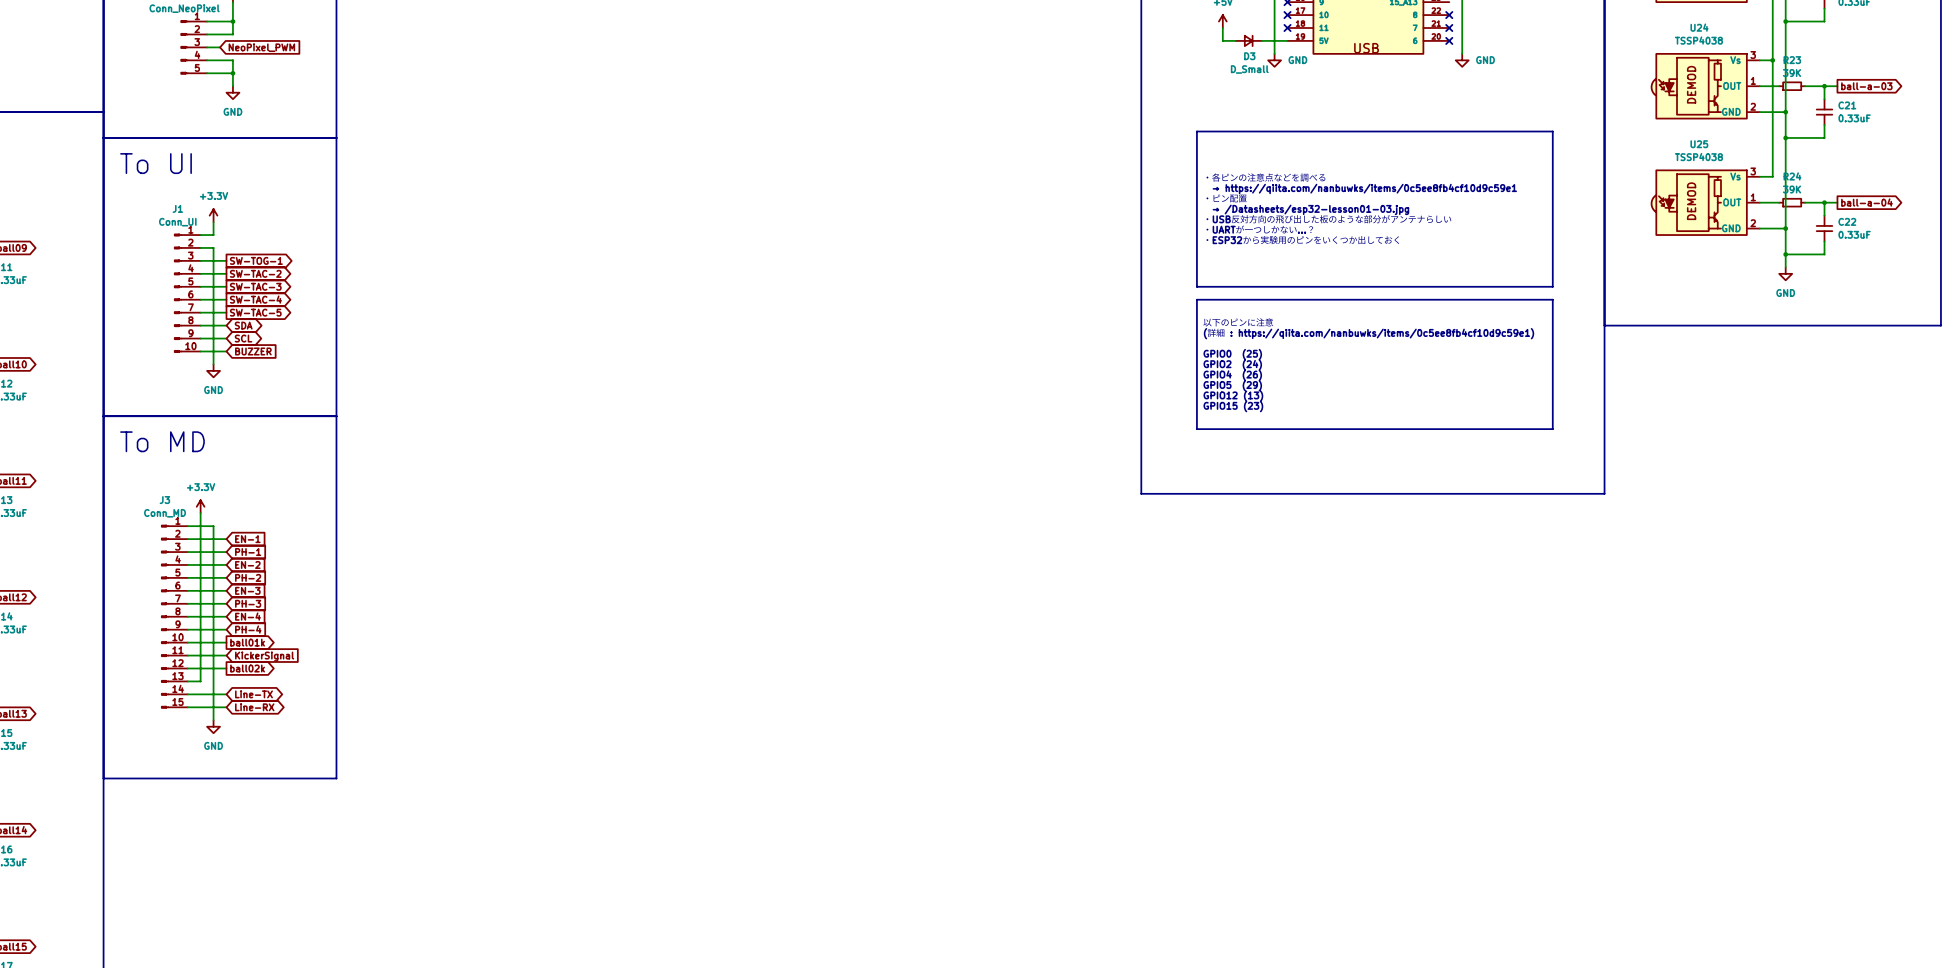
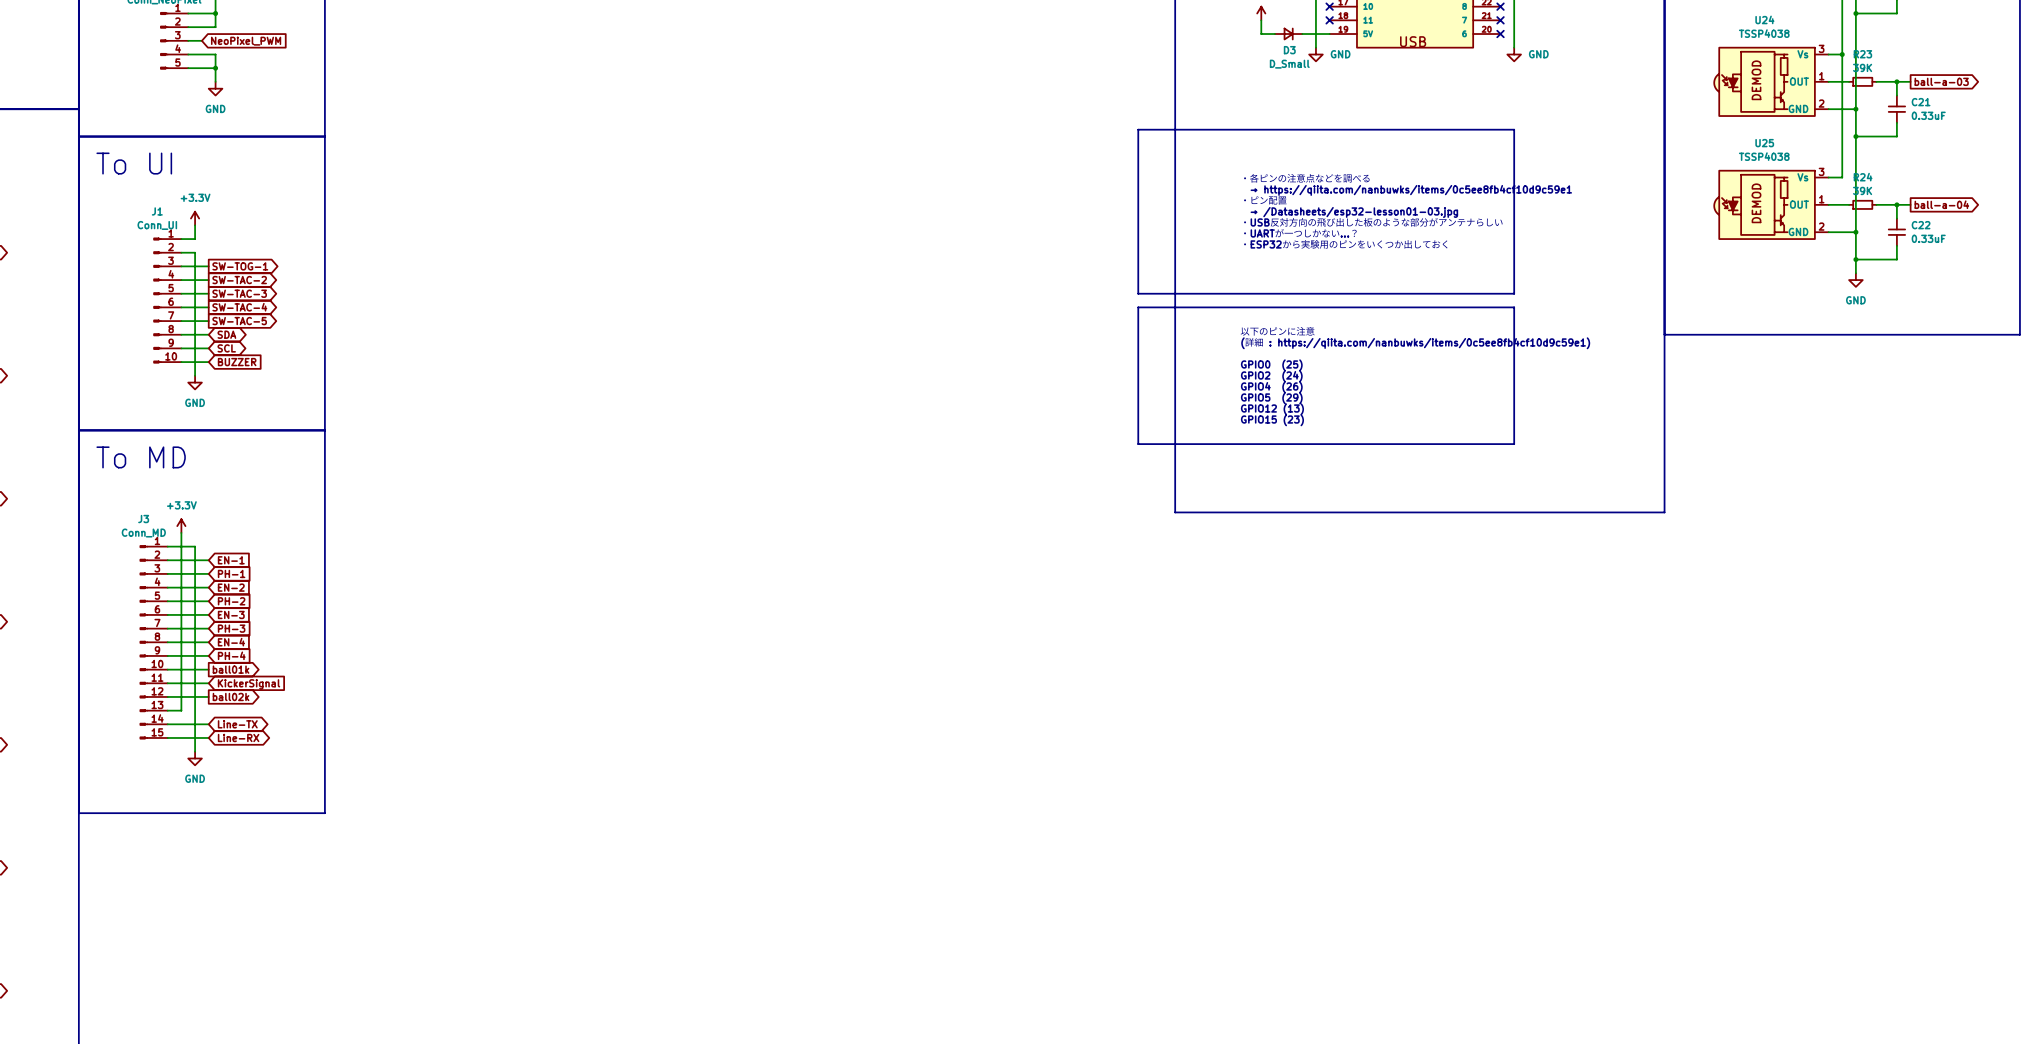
line: (1196, 131) (1196, 286) -> (1233, 129) (1138, 129) (1138, 293) (1233, 293)
line: (1462, 131) (1552, 131) (1552, 286) (1462, 286) -> (1514, 129) (1514, 293)
line: (1196, 299) (1196, 429) -> (1233, 307) (1138, 307) (1138, 444) (1233, 444)
line: (1462, 299) (1552, 299) (1552, 429) (1462, 429) -> (1514, 307) (1514, 444)

